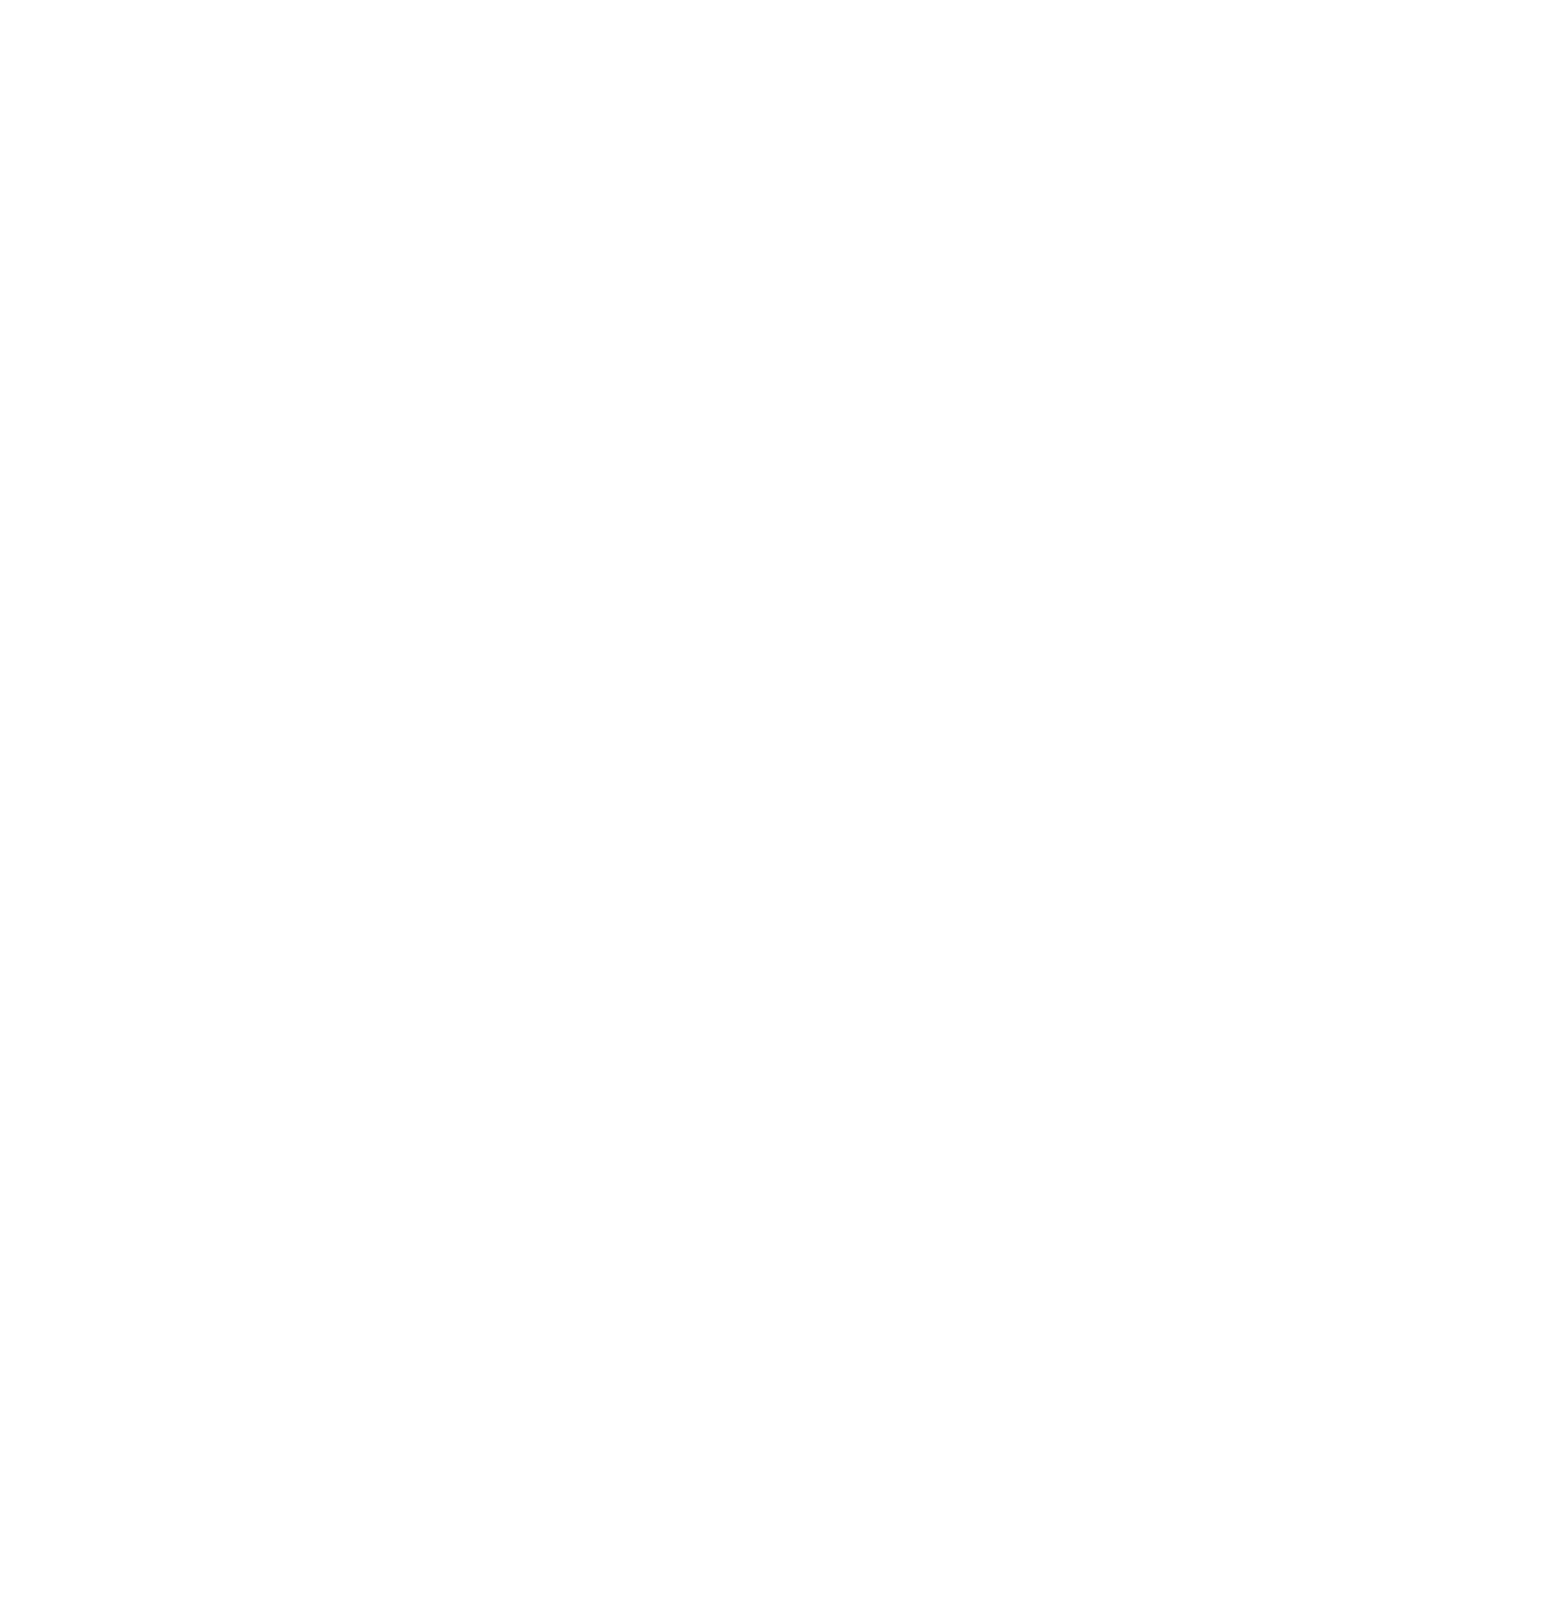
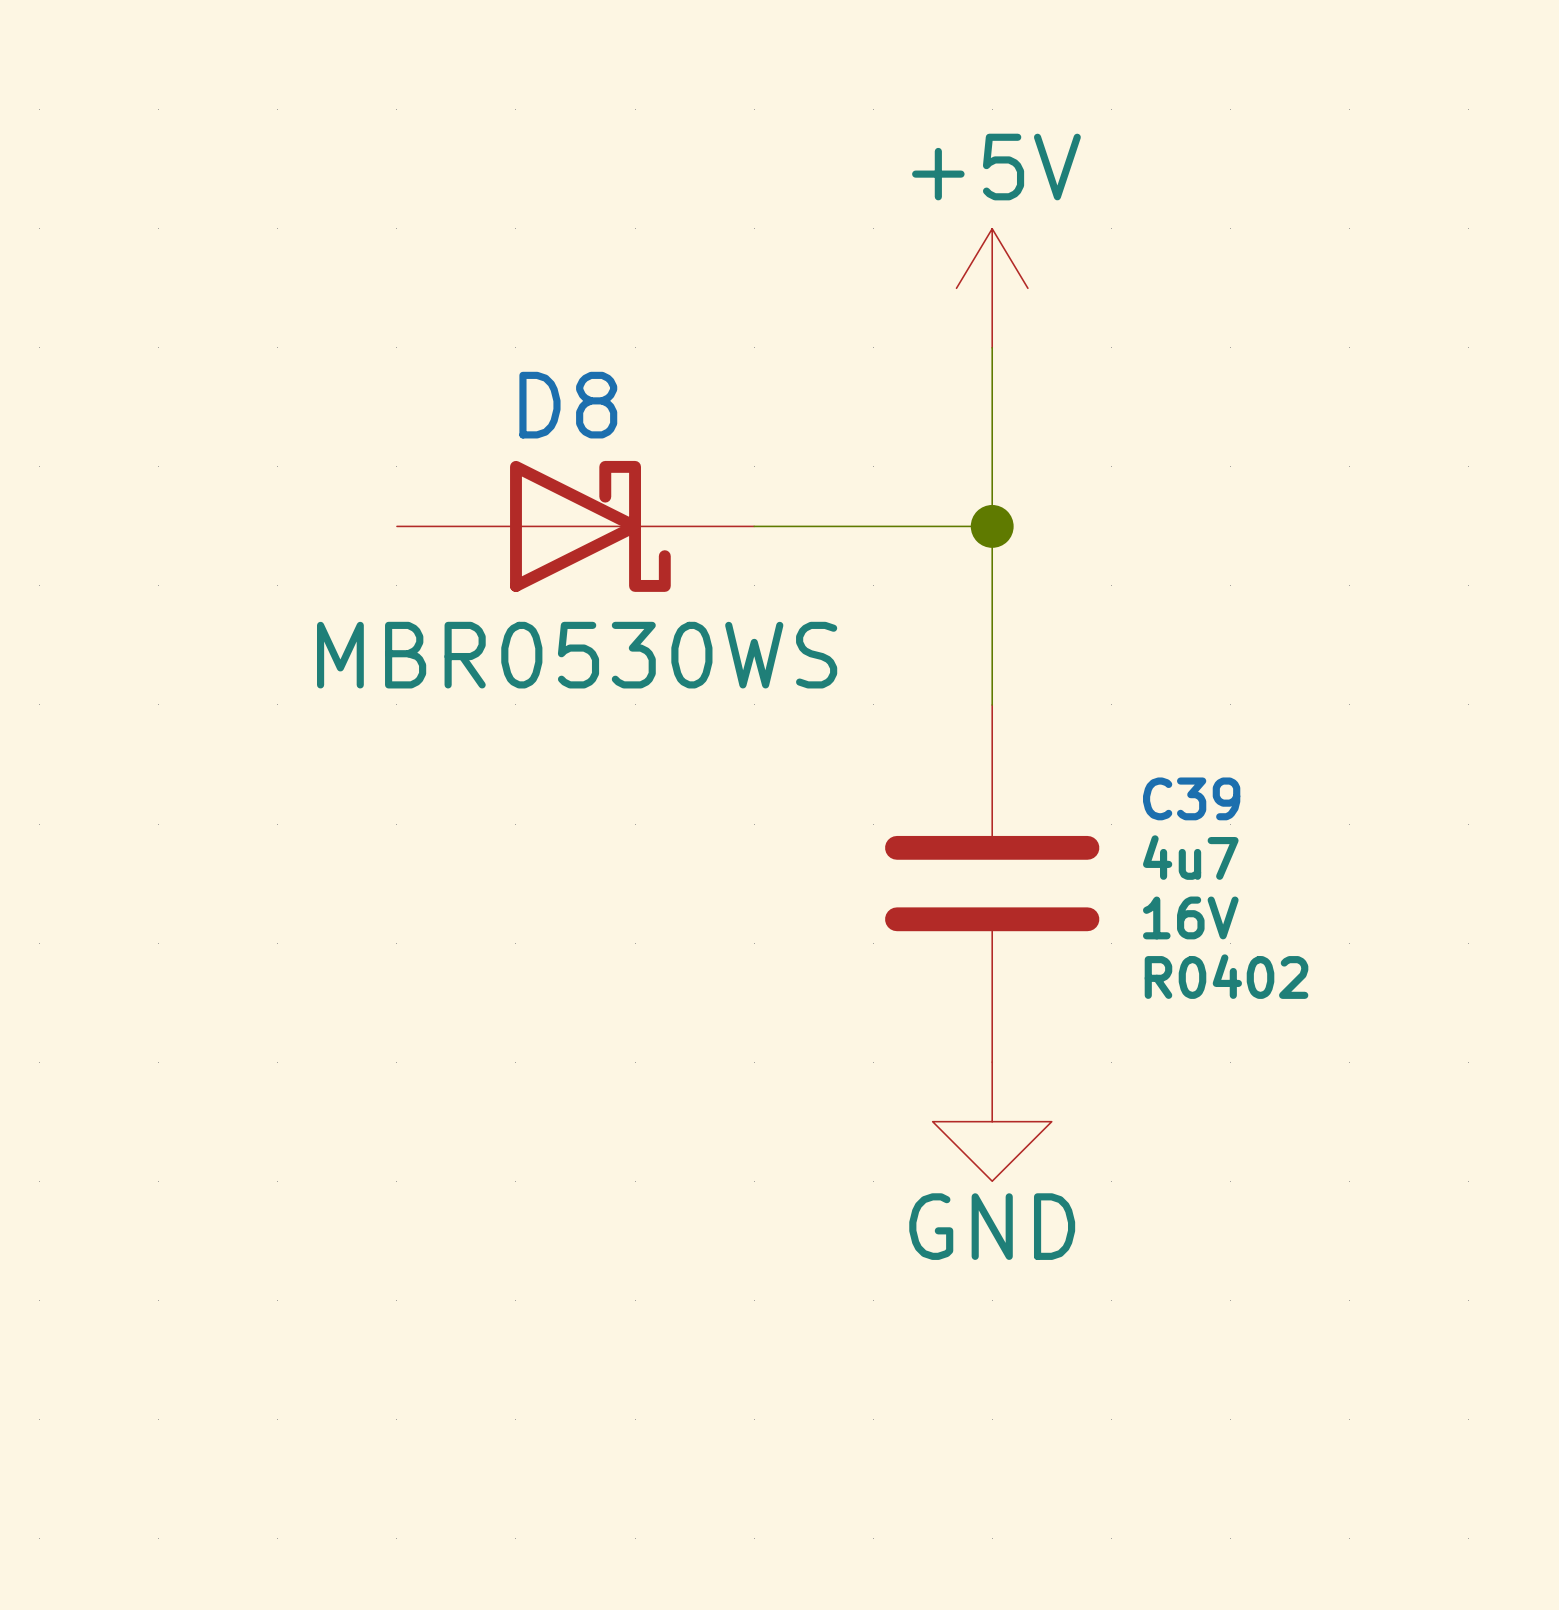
power symbol: none -> +5V (992, 288)
wire: none -> (992, 347) (992, 704)
D8: none -> MBR0530WS (575, 526)
wire: none -> (754, 526) (992, 526)
junction: none -> (992, 526)
C39: none -> 4u7 (992, 883)
power symbol: none -> GND (992, 1121)

